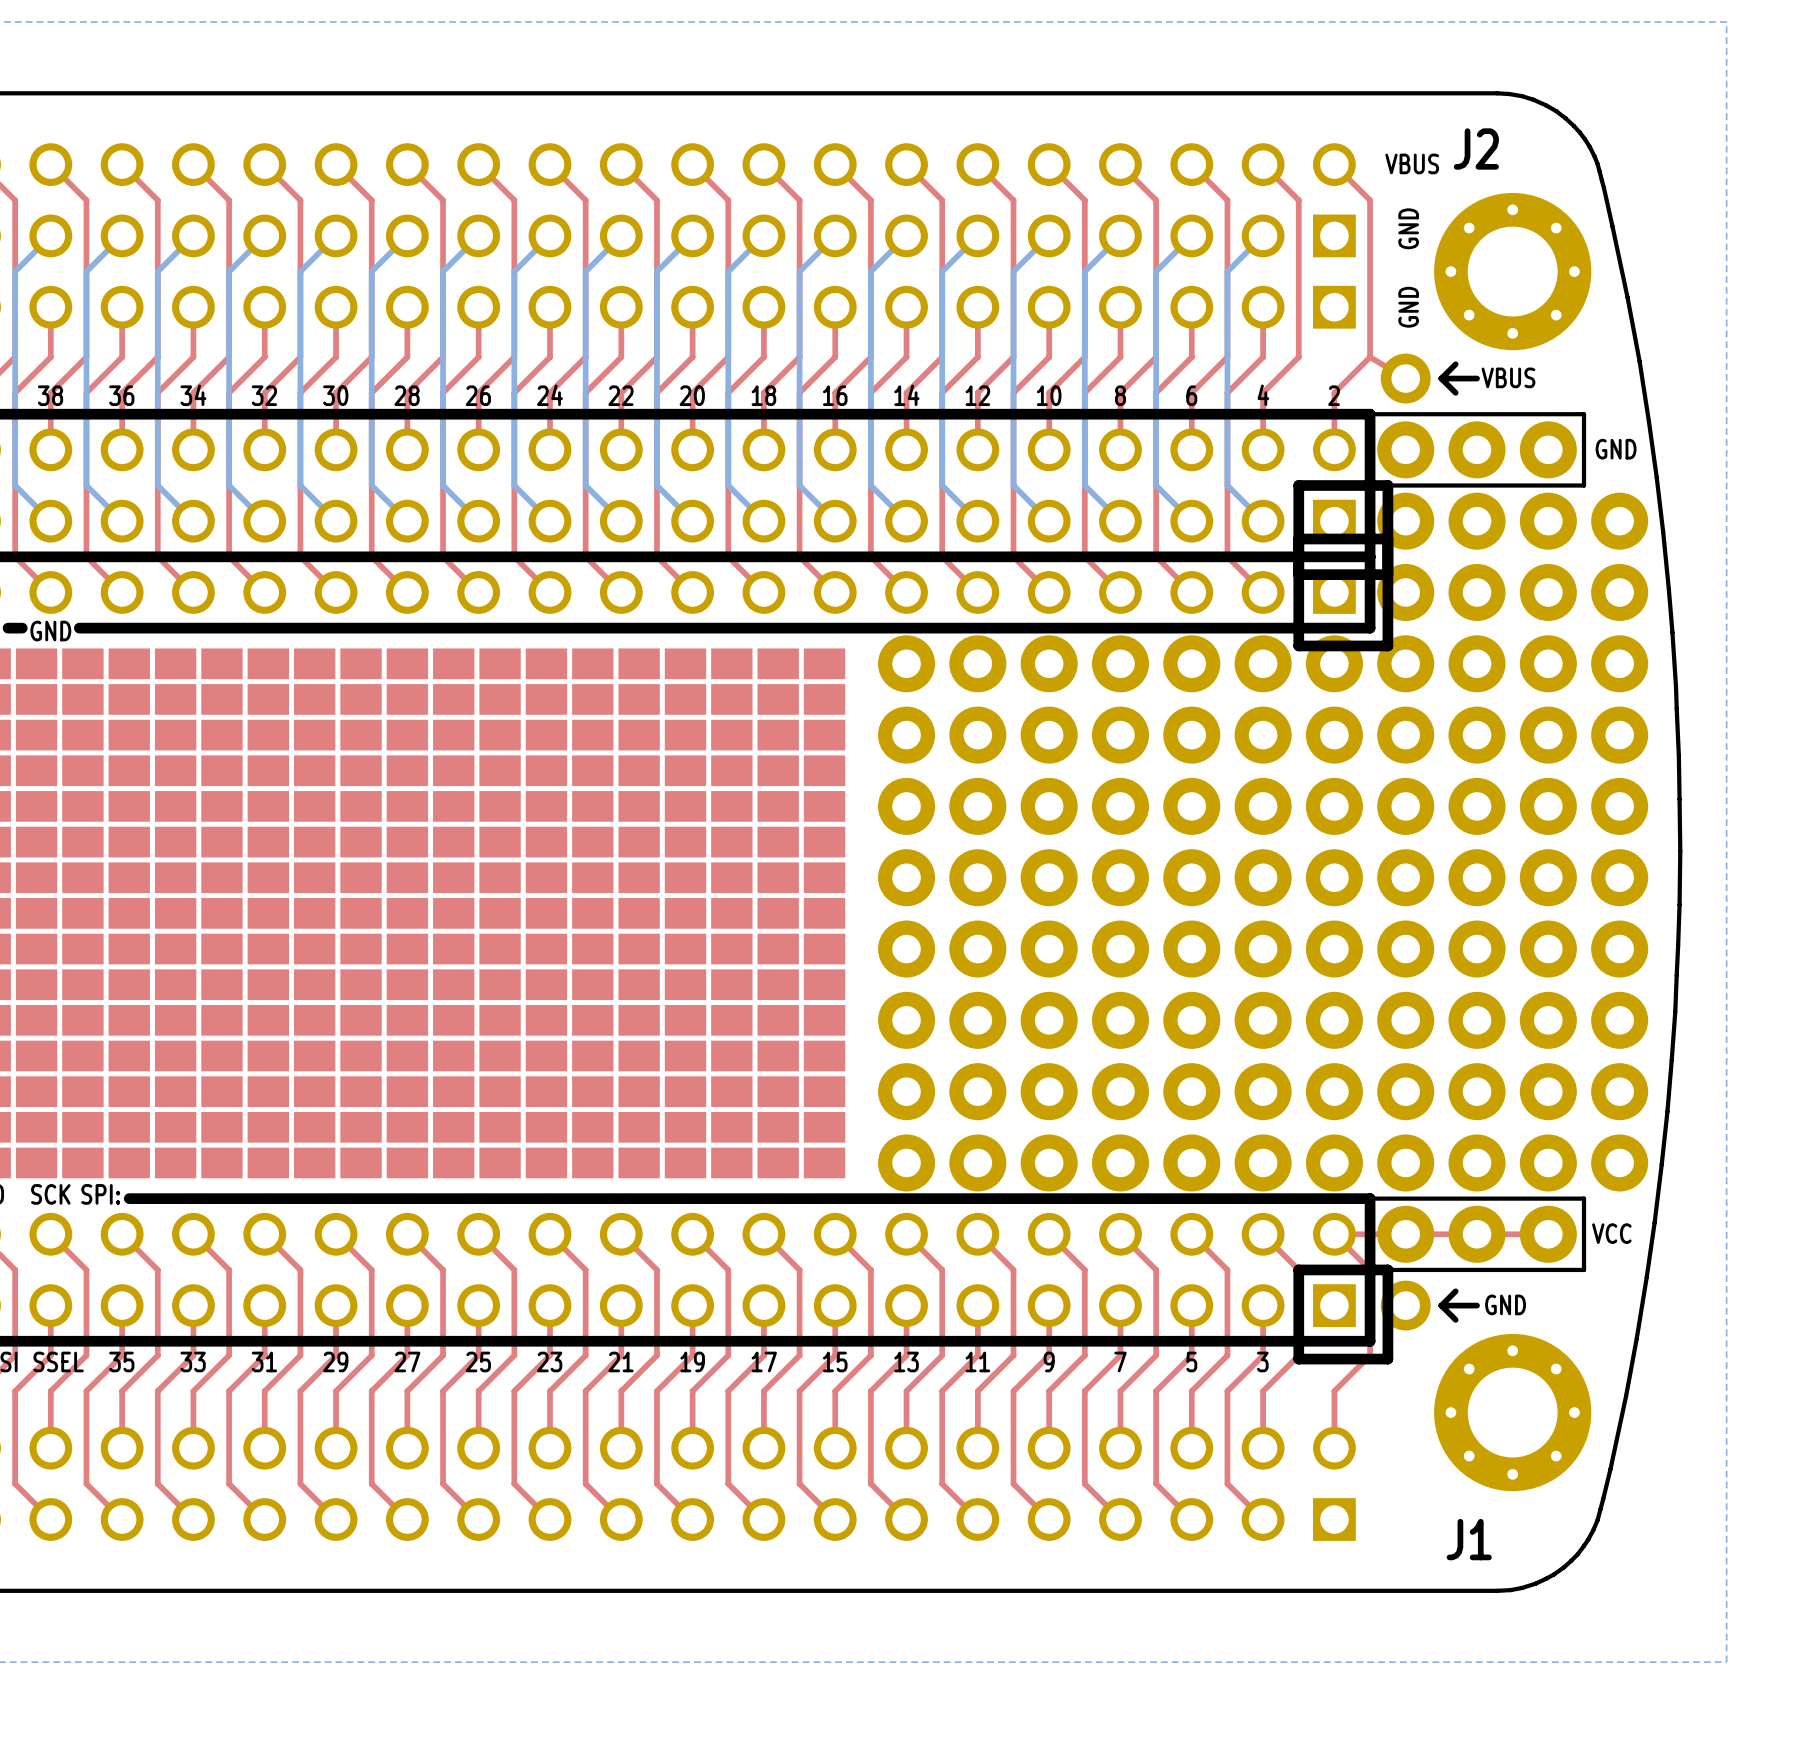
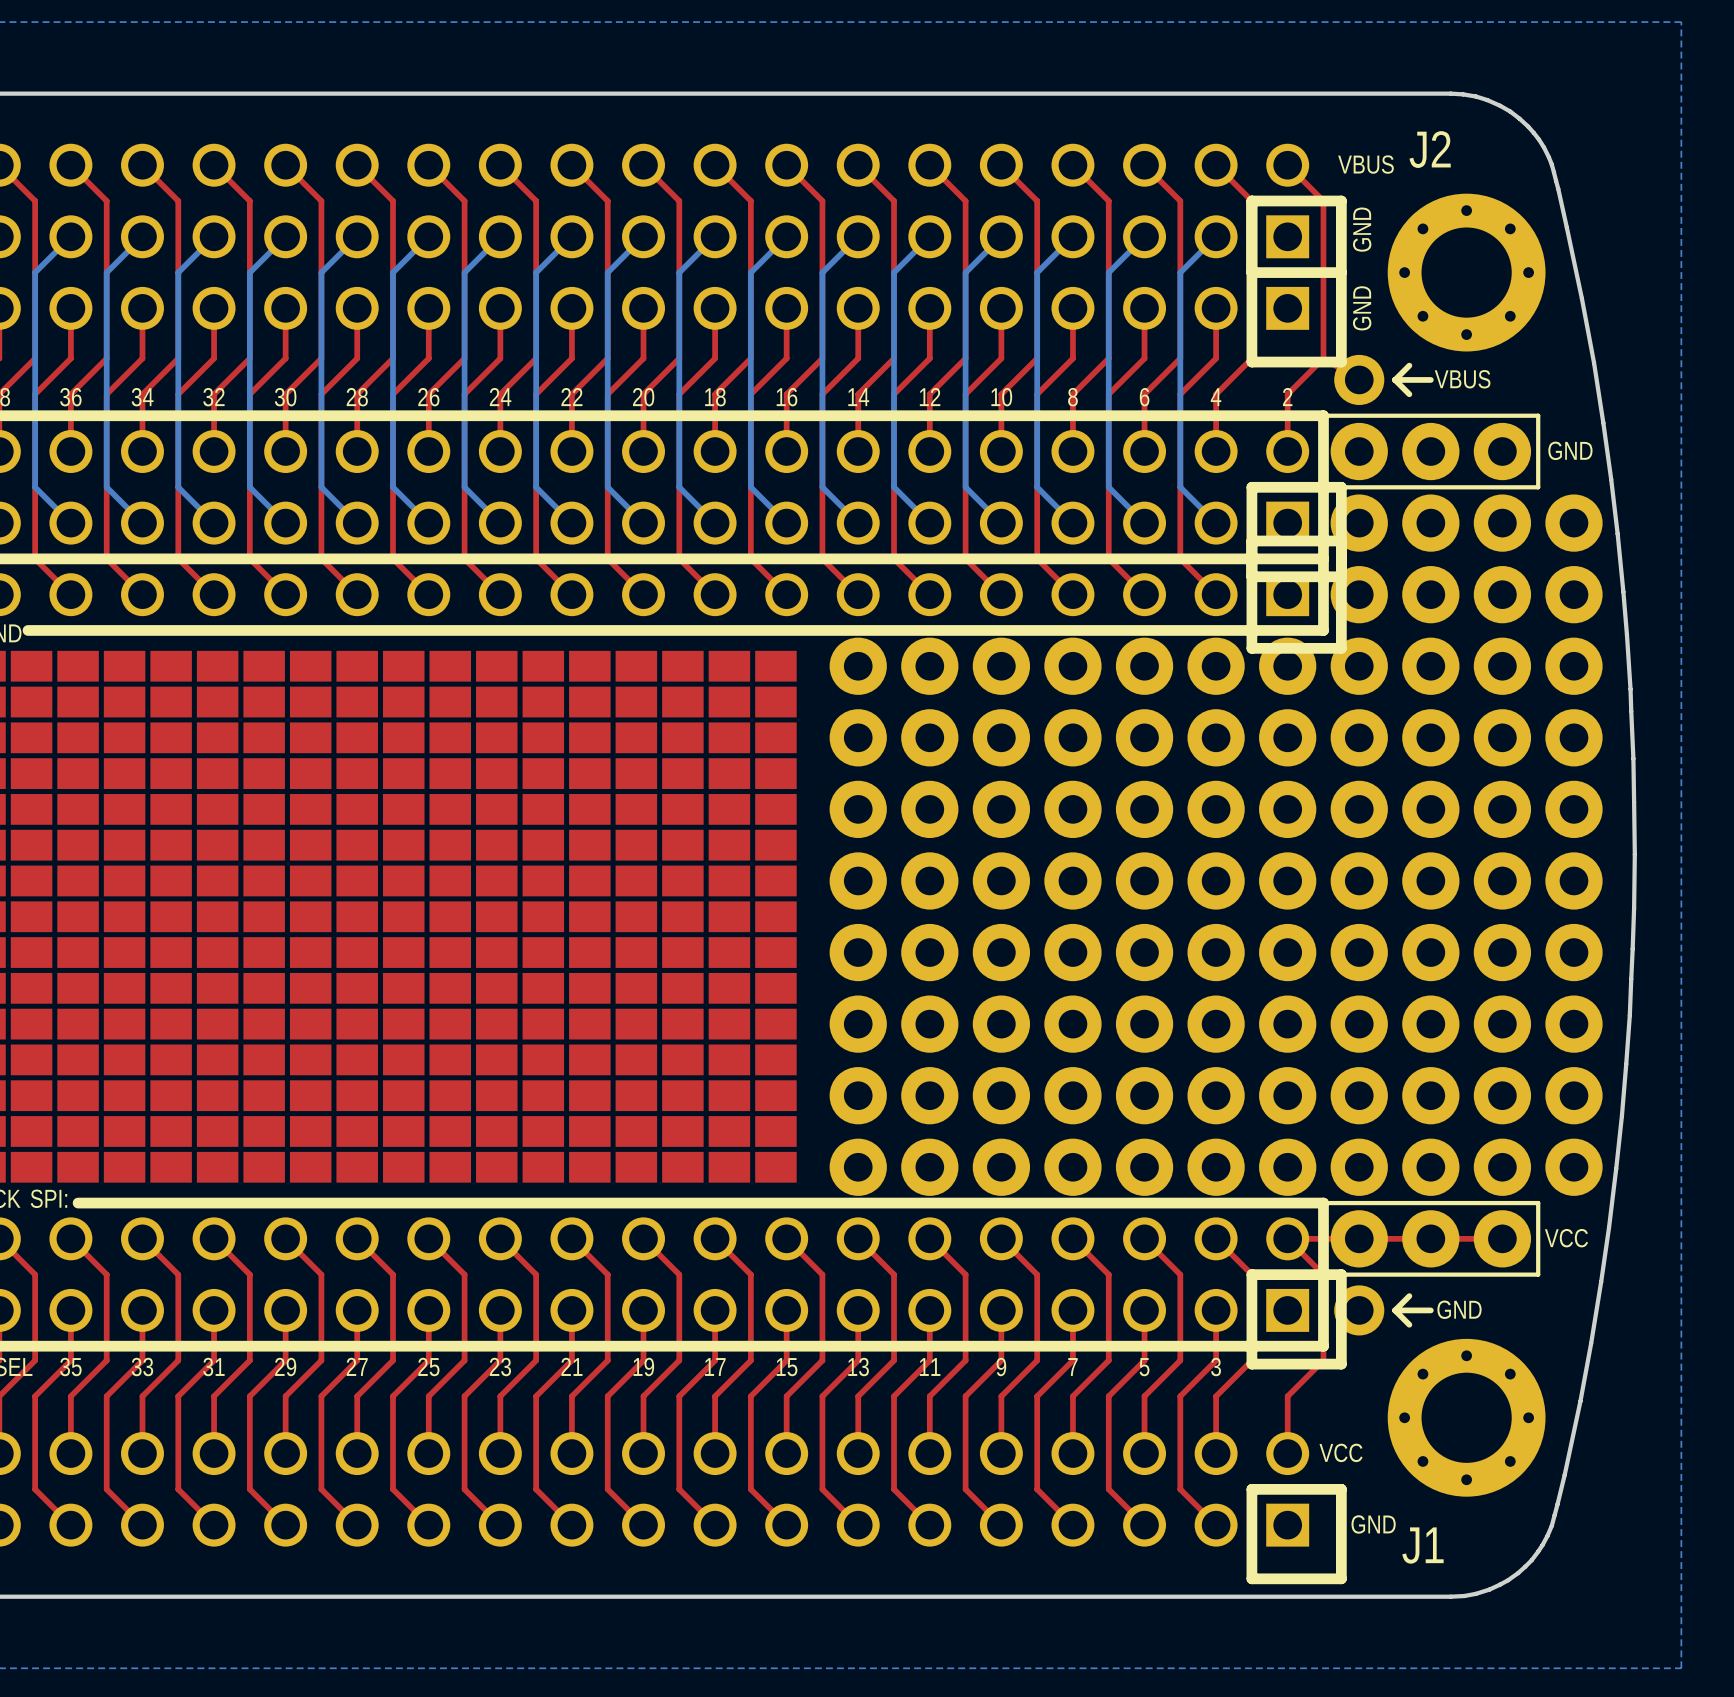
line: none -> (1341, 201) (1341, 362) (1251, 362) (1251, 201) (1341, 201)
line: none -> (1341, 272) (1251, 272)
text: none -> VCC (1341, 1452)
line: none -> (1341, 1489) (1341, 1578) (1251, 1578) (1251, 1489) (1341, 1489)
text: none -> GND (1373, 1524)

